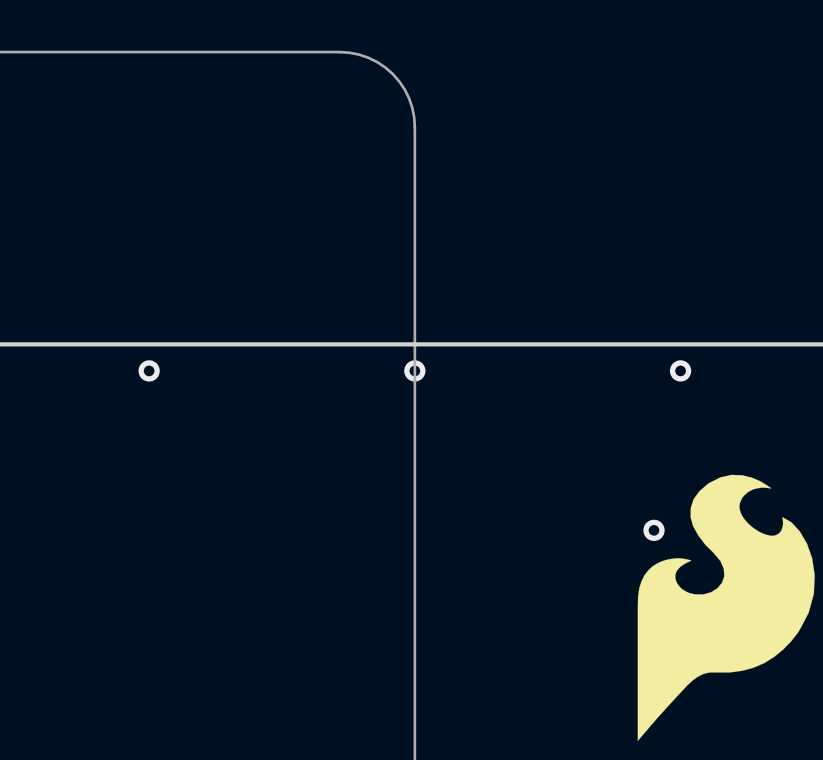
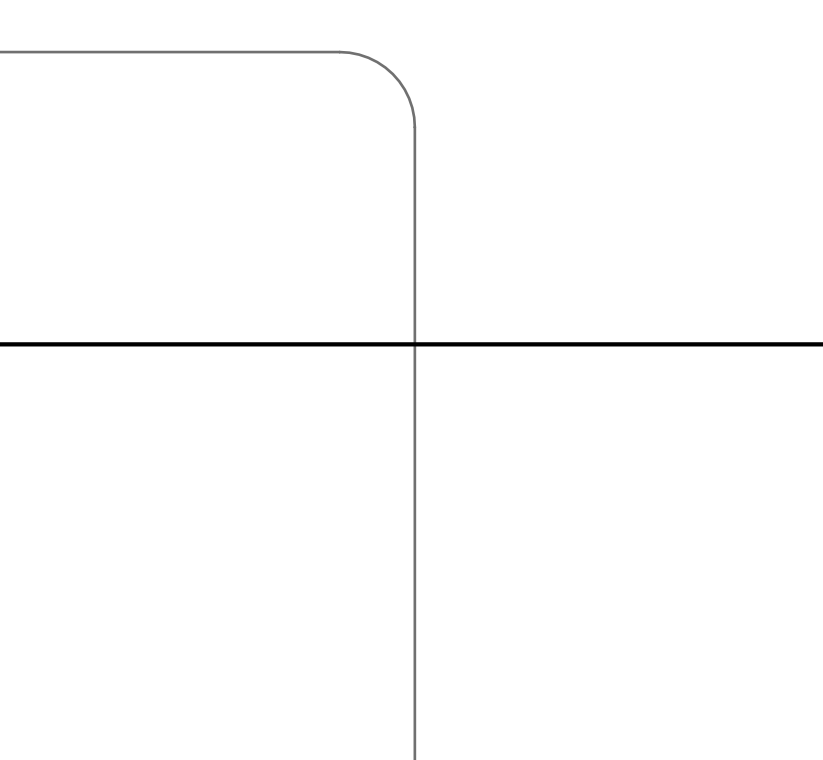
via: (149, 370) -> none
via: (414, 370) -> none
via: (680, 370) -> none
drawing: [637, 474, 815, 741] -> none
via: (654, 530) -> none

